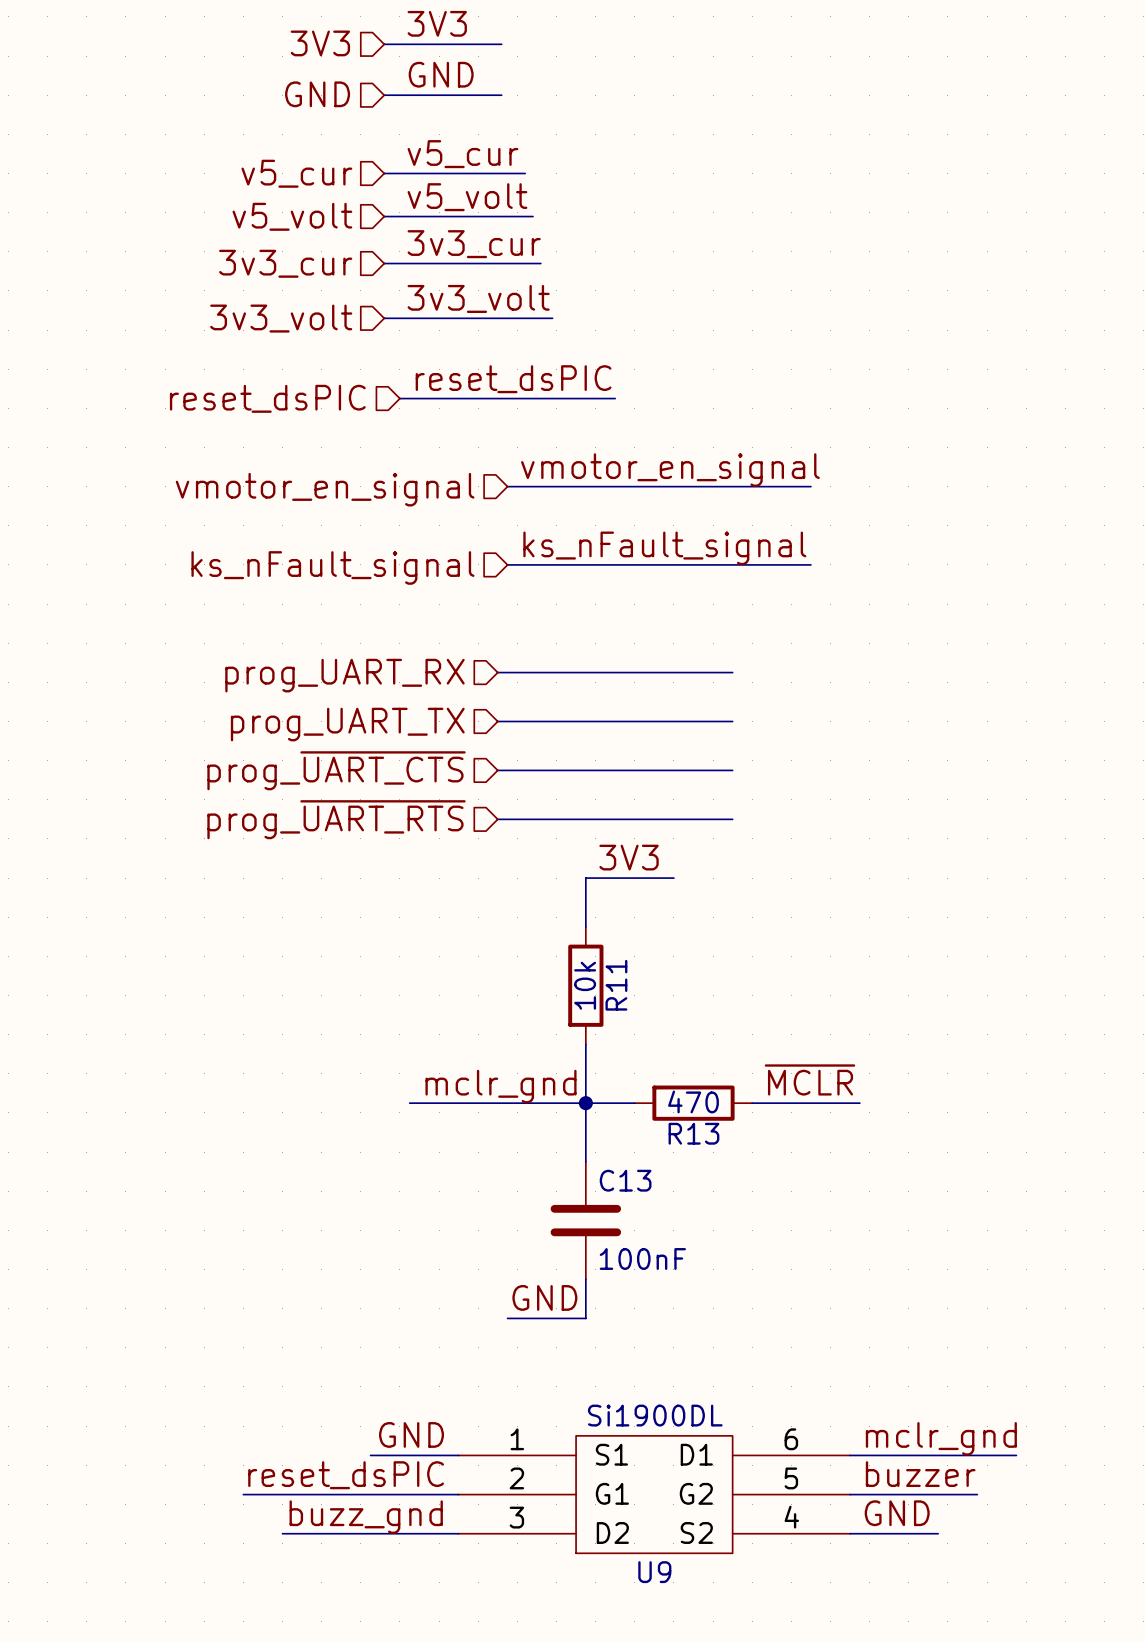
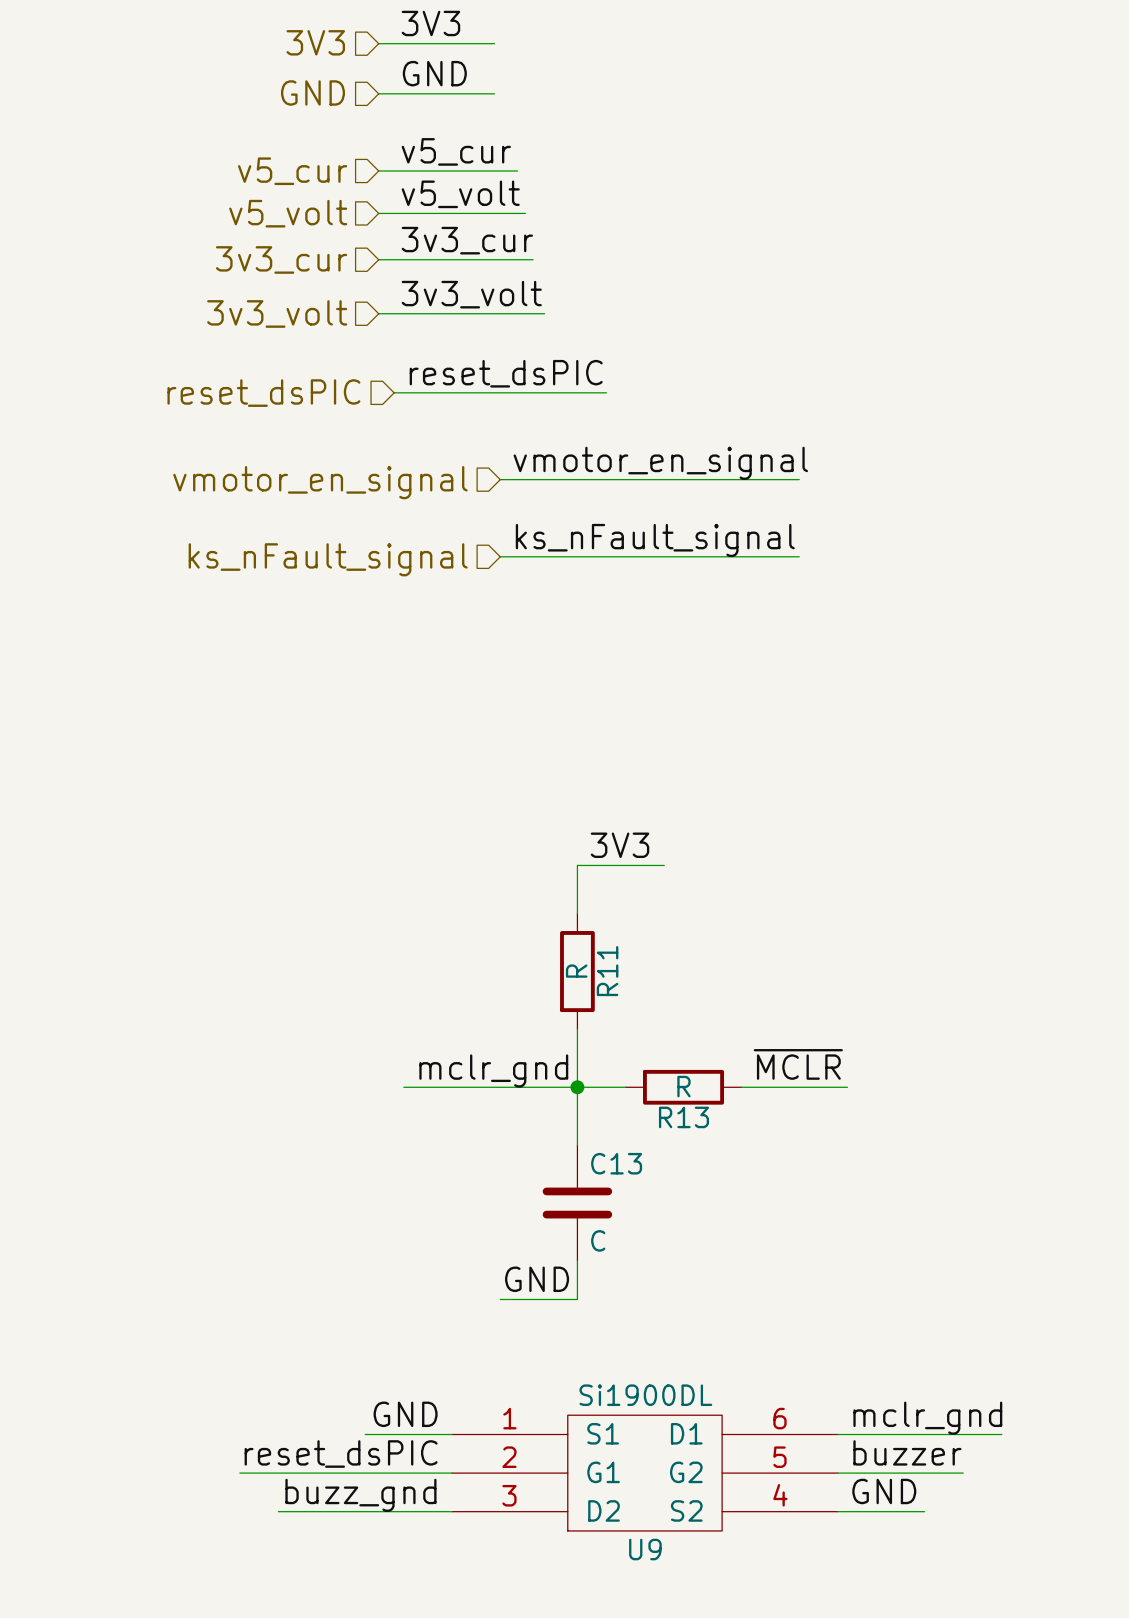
wire: (497, 672) (732, 672) -> none
hierarchical label: prog_UART_RX (344, 675) -> none
wire: (497, 721) (732, 721) -> none
hierarchical label: prog_UART_TX (347, 724) -> none
hierarchical label: prog_~{UART_CTS} (336, 770) -> none
wire: (497, 770) (732, 770) -> none
hierarchical label: prog_~{UART_RTS} (336, 819) -> none
wire: (497, 819) (732, 819) -> none
R11 value: 10k (585, 985) -> R (576, 971)
R13 value: 470 (693, 1101) -> R (683, 1086)
C13 value: 100nF (642, 1258) -> C (598, 1240)

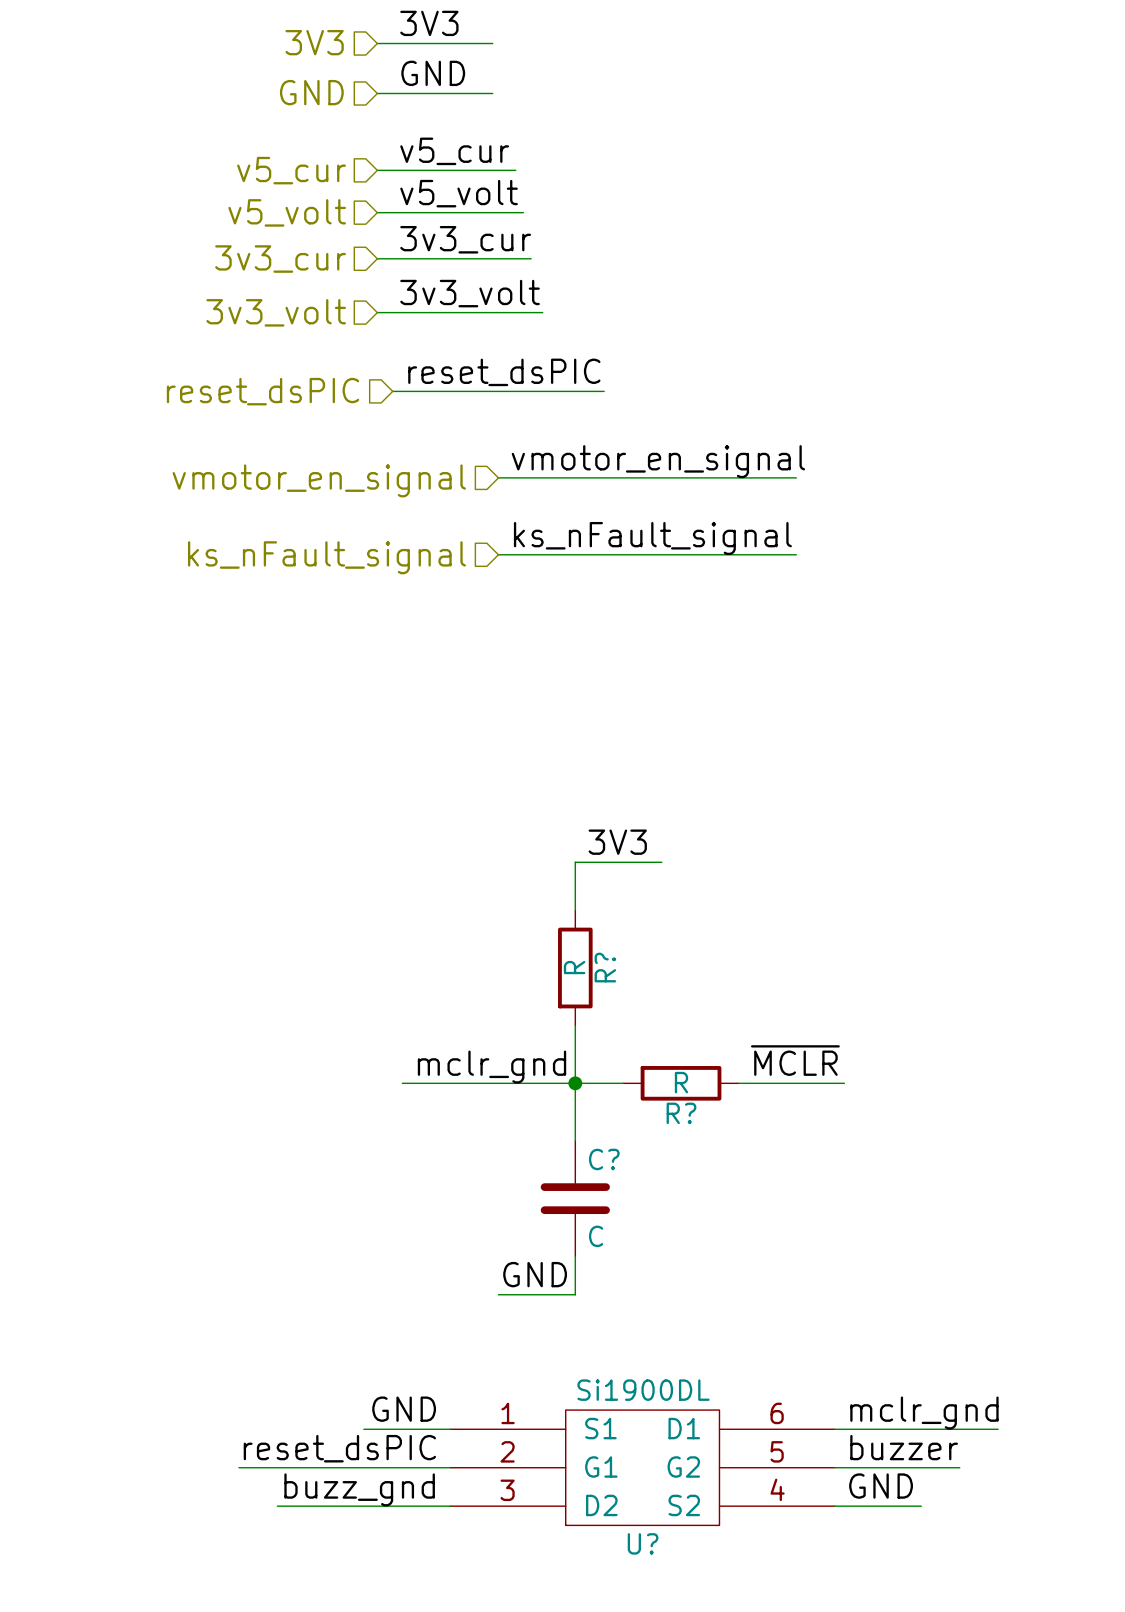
R11 name: R11 (607, 971) -> R? (605, 967)
R13 name: R13 (683, 1117) -> R? (681, 1113)
C13 name: C13 (616, 1163) -> C? (604, 1159)
U9 name: U9 (645, 1549) -> U? (643, 1543)

